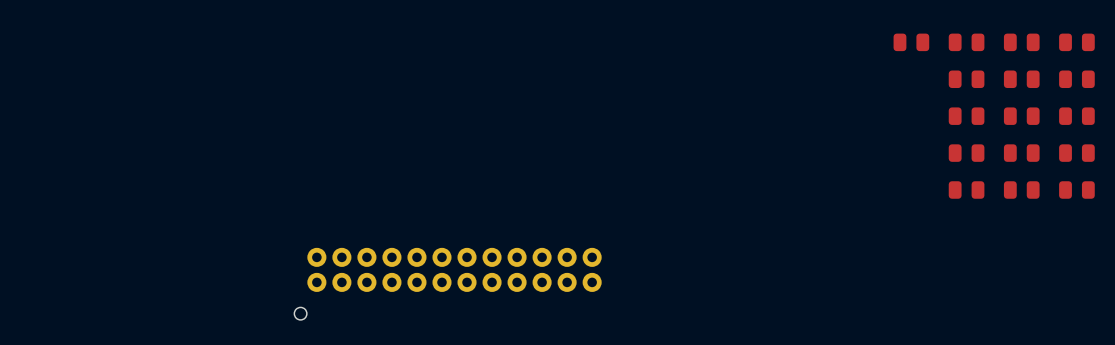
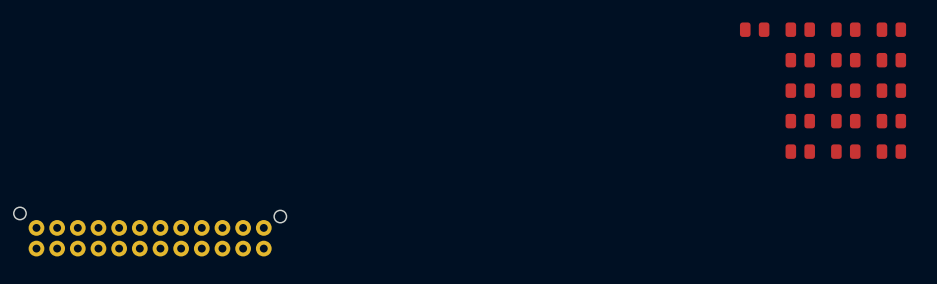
part: (448, 283) -> none
part: none -> (150, 231)

